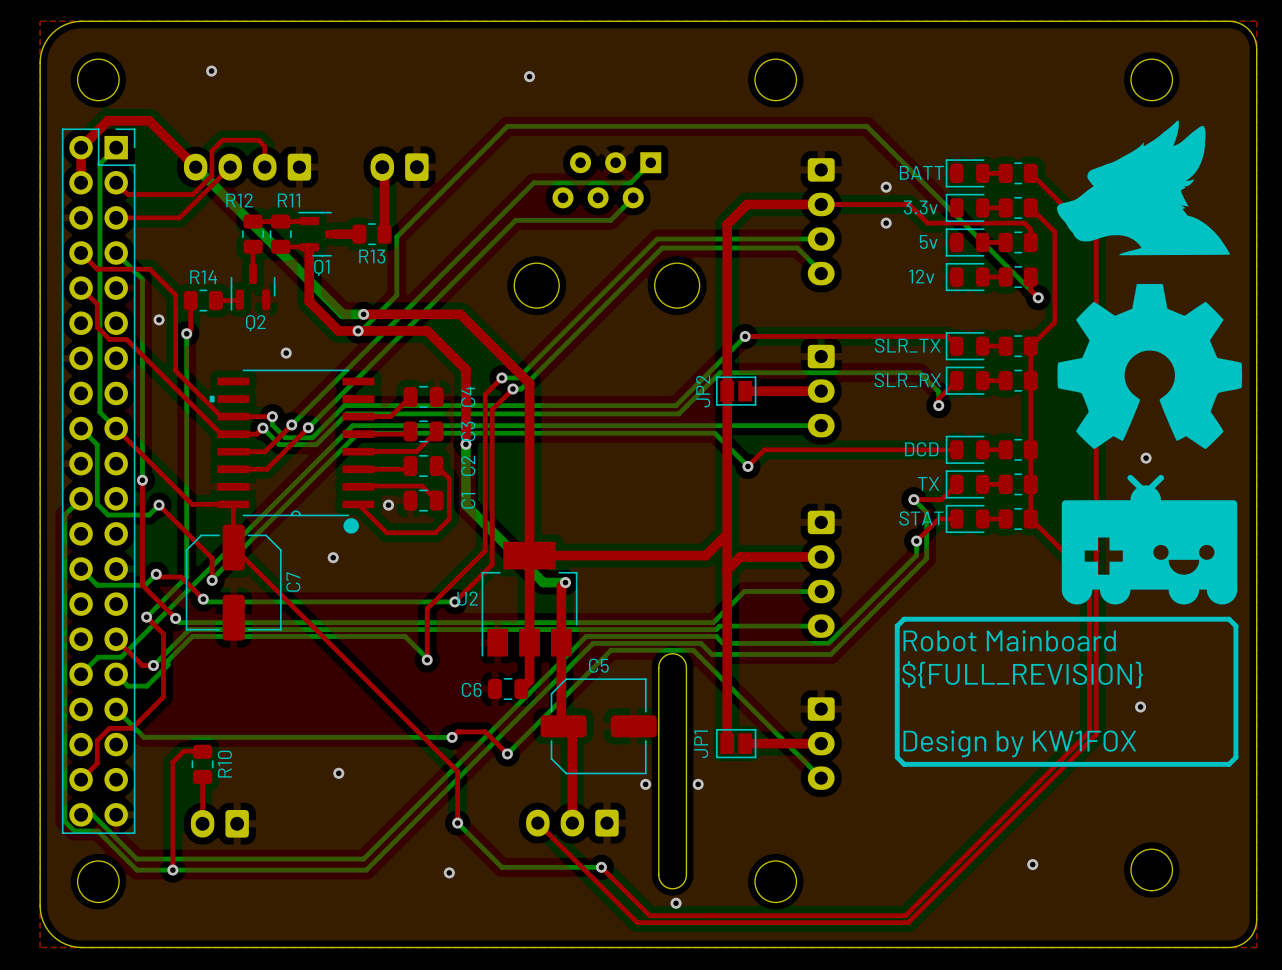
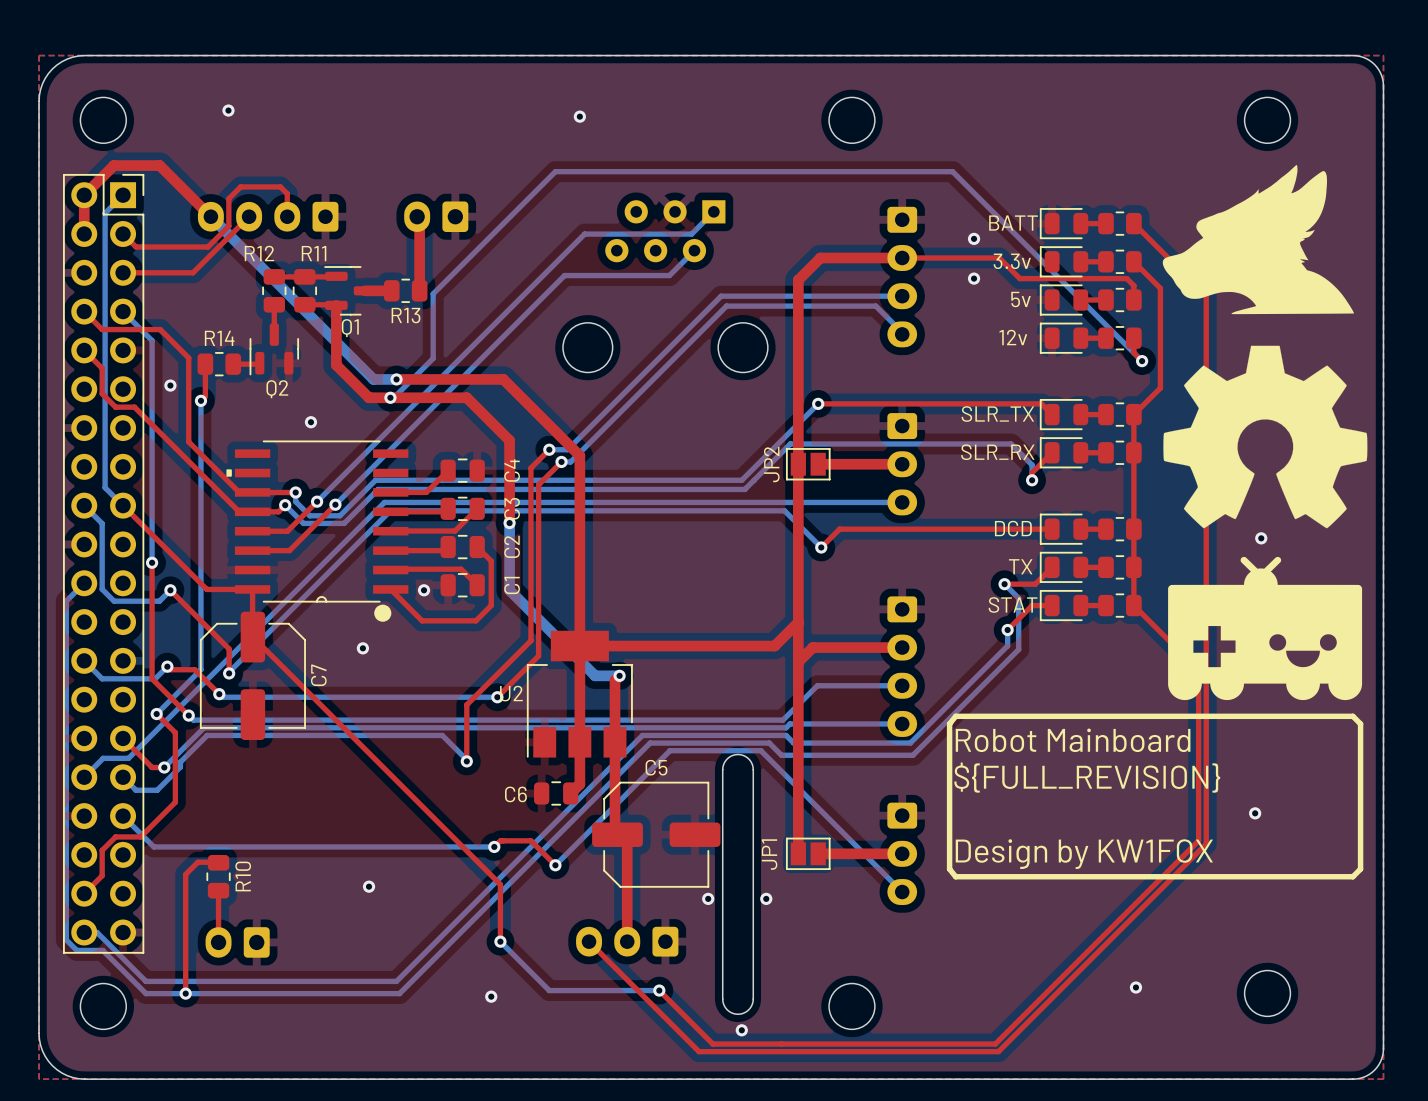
line: (904, 619) (897, 626) (897, 757) (904, 764) -> (993, 716) (955, 716) (949, 723) (949, 869) (955, 876) (993, 876)
text position: Robot Mainboard (1009, 640) -> Robot Mainboard (1073, 740)
text position: ${FULL_REVISION} (1022, 674) -> ${FULL_REVISION} (1087, 777)
text position: Design by KW1FOX (1019, 743) -> Design by KW1FOX (1084, 854)

